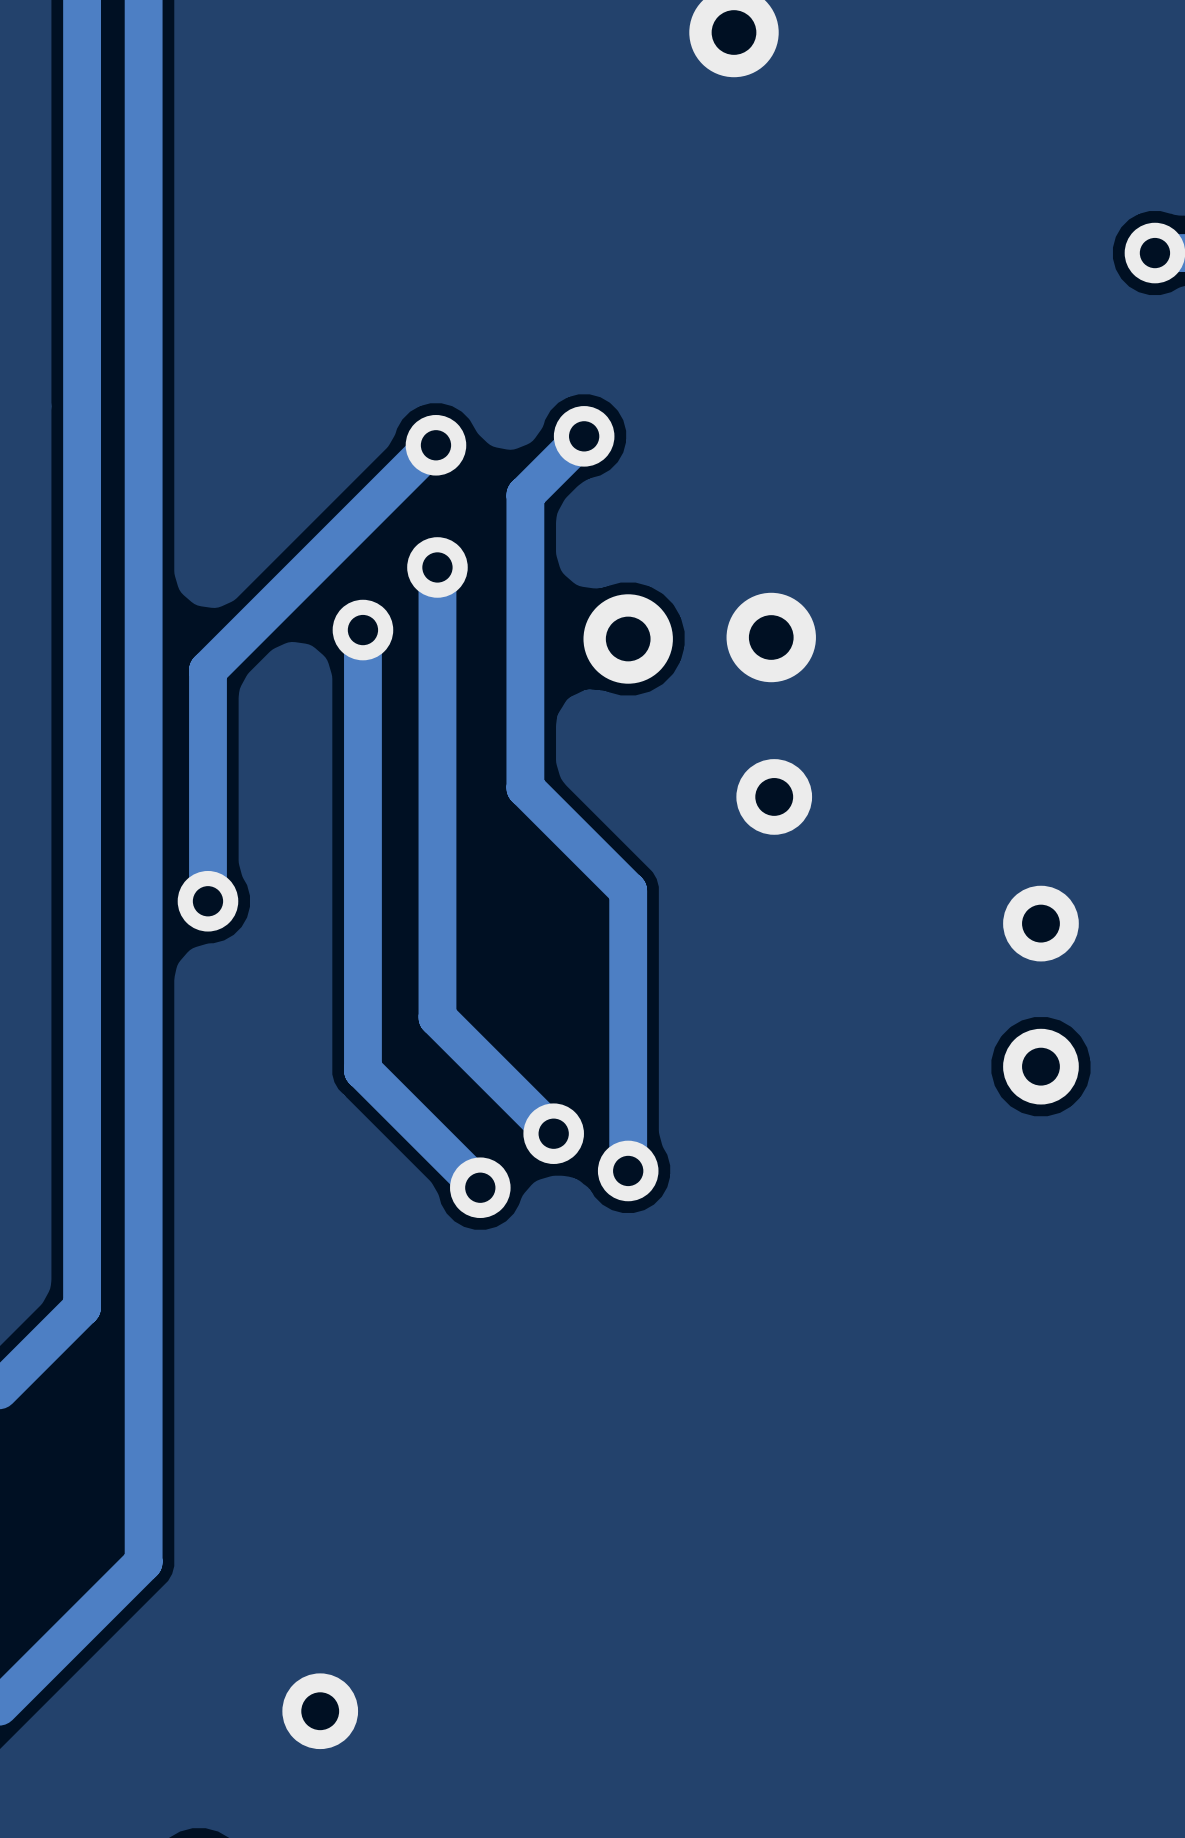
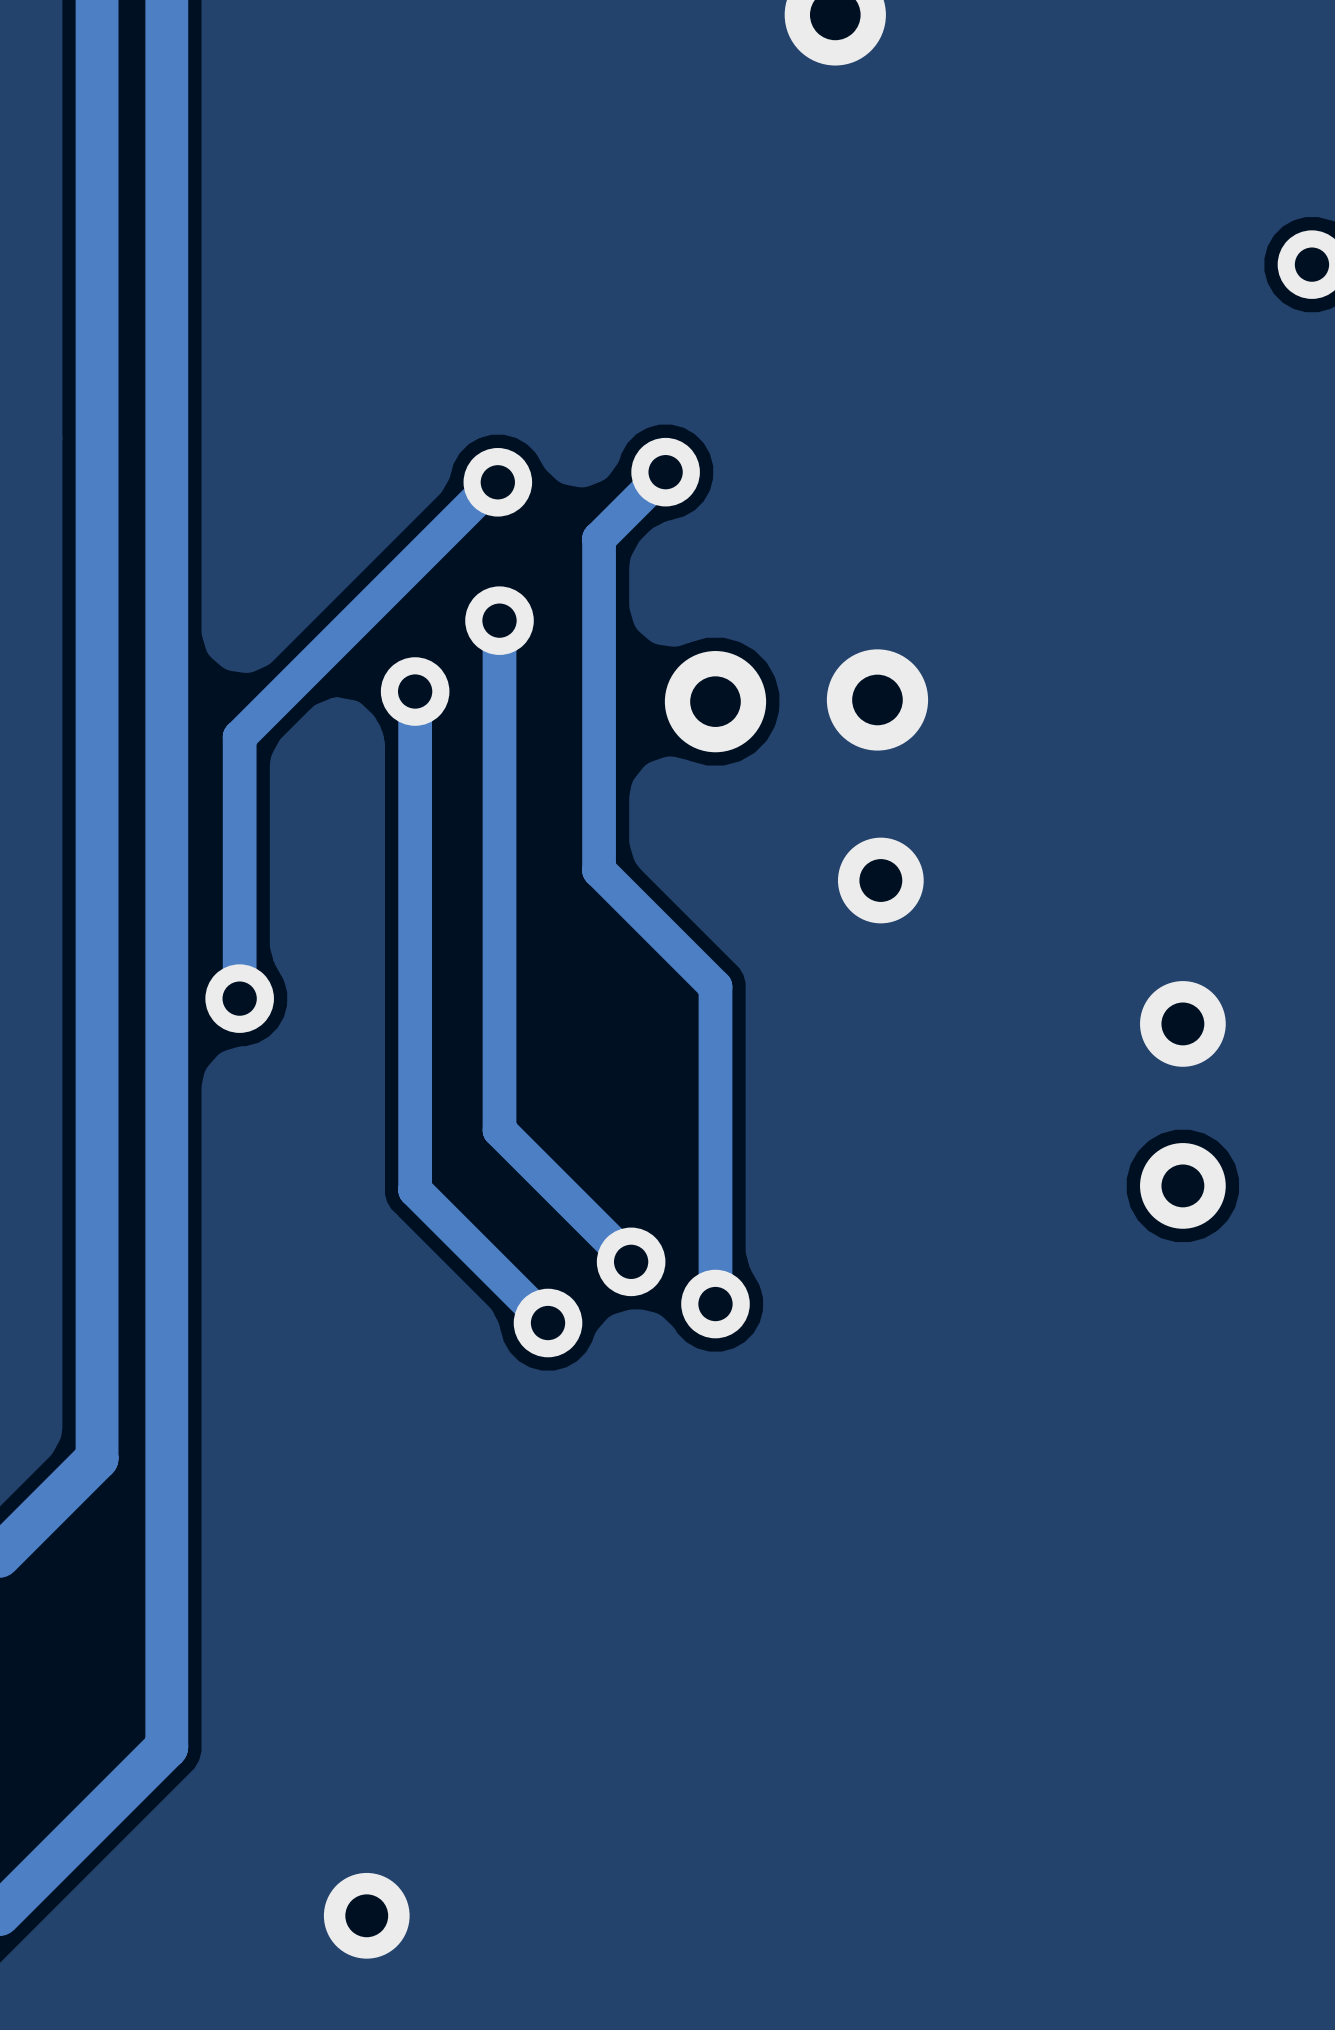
track width: thick (584, 436) (525, 495) (525, 788) (628, 890) (628, 1170) -> thin (665, 472) (599, 538) (599, 870) (715, 986) (715, 1304)
track width: thick (432, 445) (207, 670) (207, 901) -> thin (494, 482) (239, 737) (239, 998)
track width: thick (437, 567) (437, 1017) (553, 1133) -> thin (499, 620) (499, 1130) (631, 1261)
track width: thick (362, 630) (362, 1070) (480, 1187) -> thin (415, 691) (415, 1190) (548, 1323)

